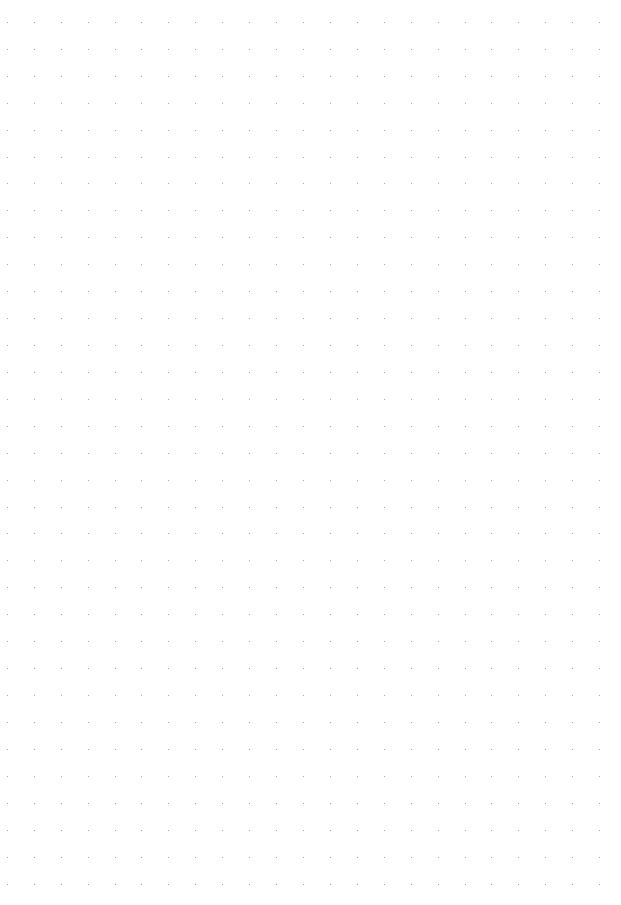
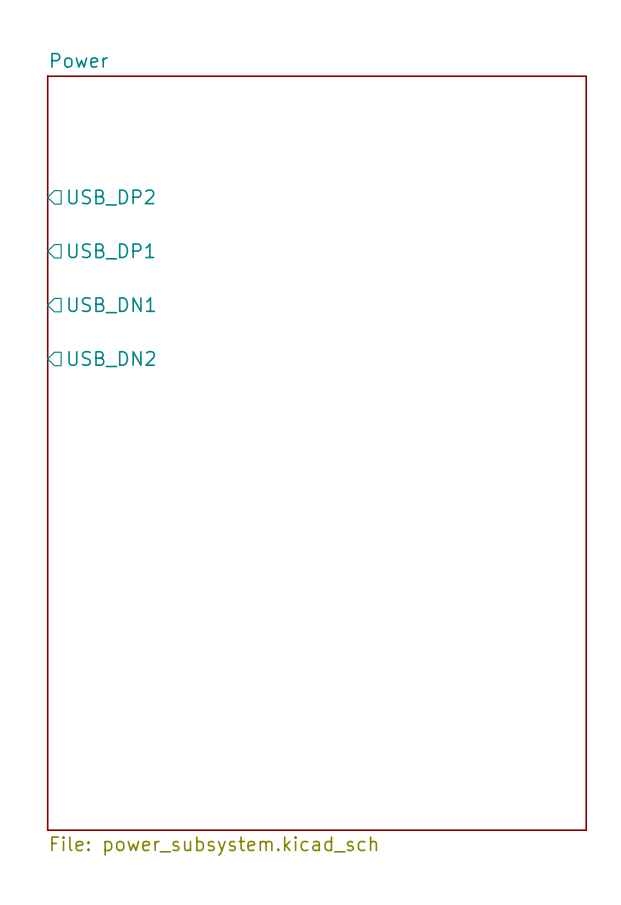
sheet pin: none -> USB_DP2 (111, 197)
sheet pin: none -> USB_DP1 (111, 251)
sheet pin: none -> USB_DN1 (111, 305)
sheet pin: none -> USB_DN2 (111, 359)
sheet Power: none -> File: power_subsystem.kicad_sch (316, 453)

